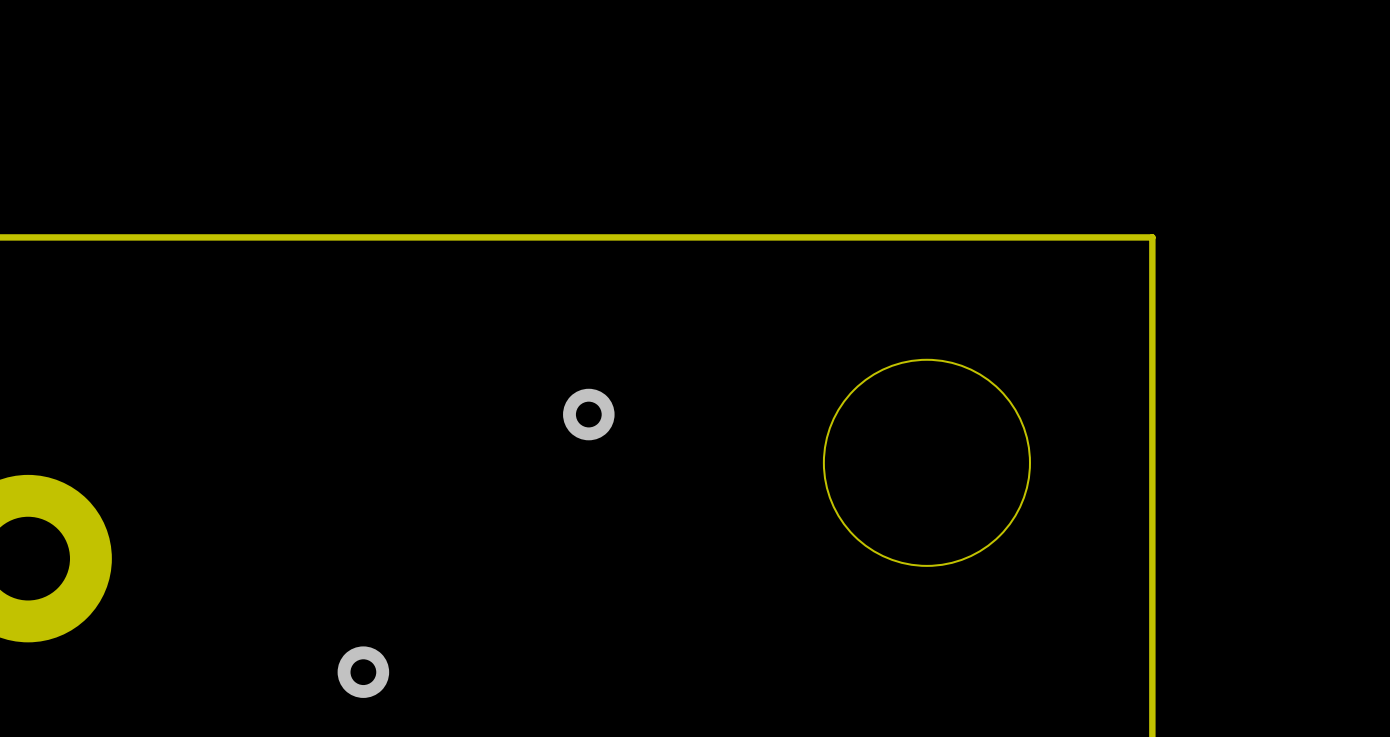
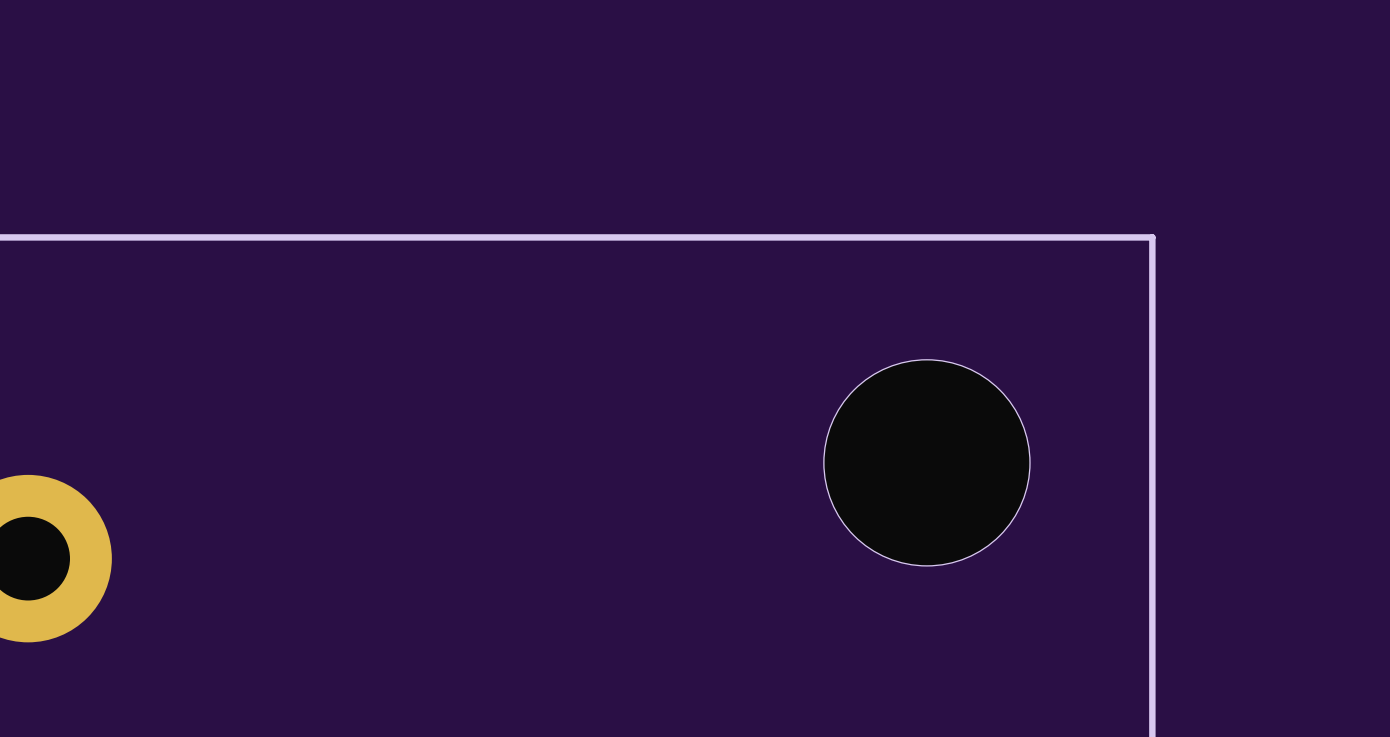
via: (588, 414) -> none
via: (363, 672) -> none

